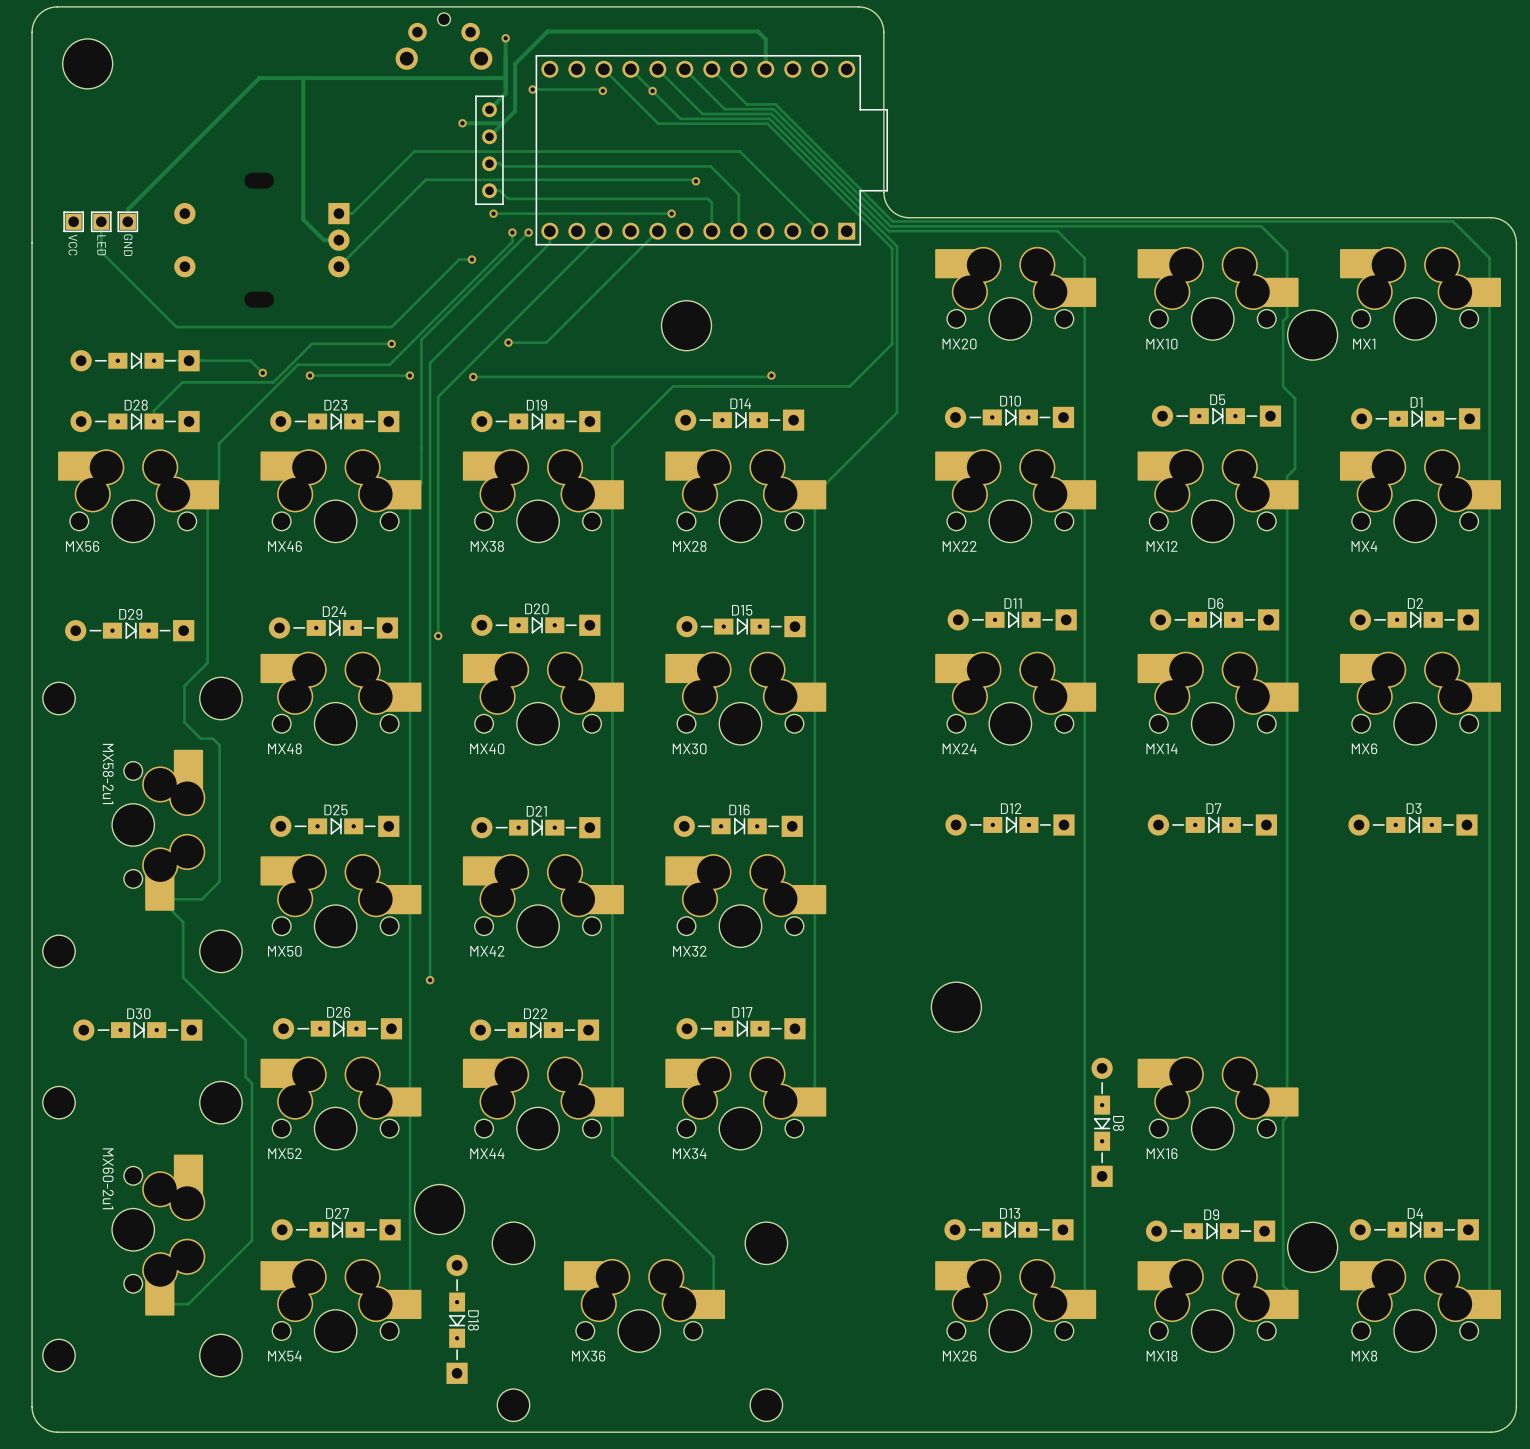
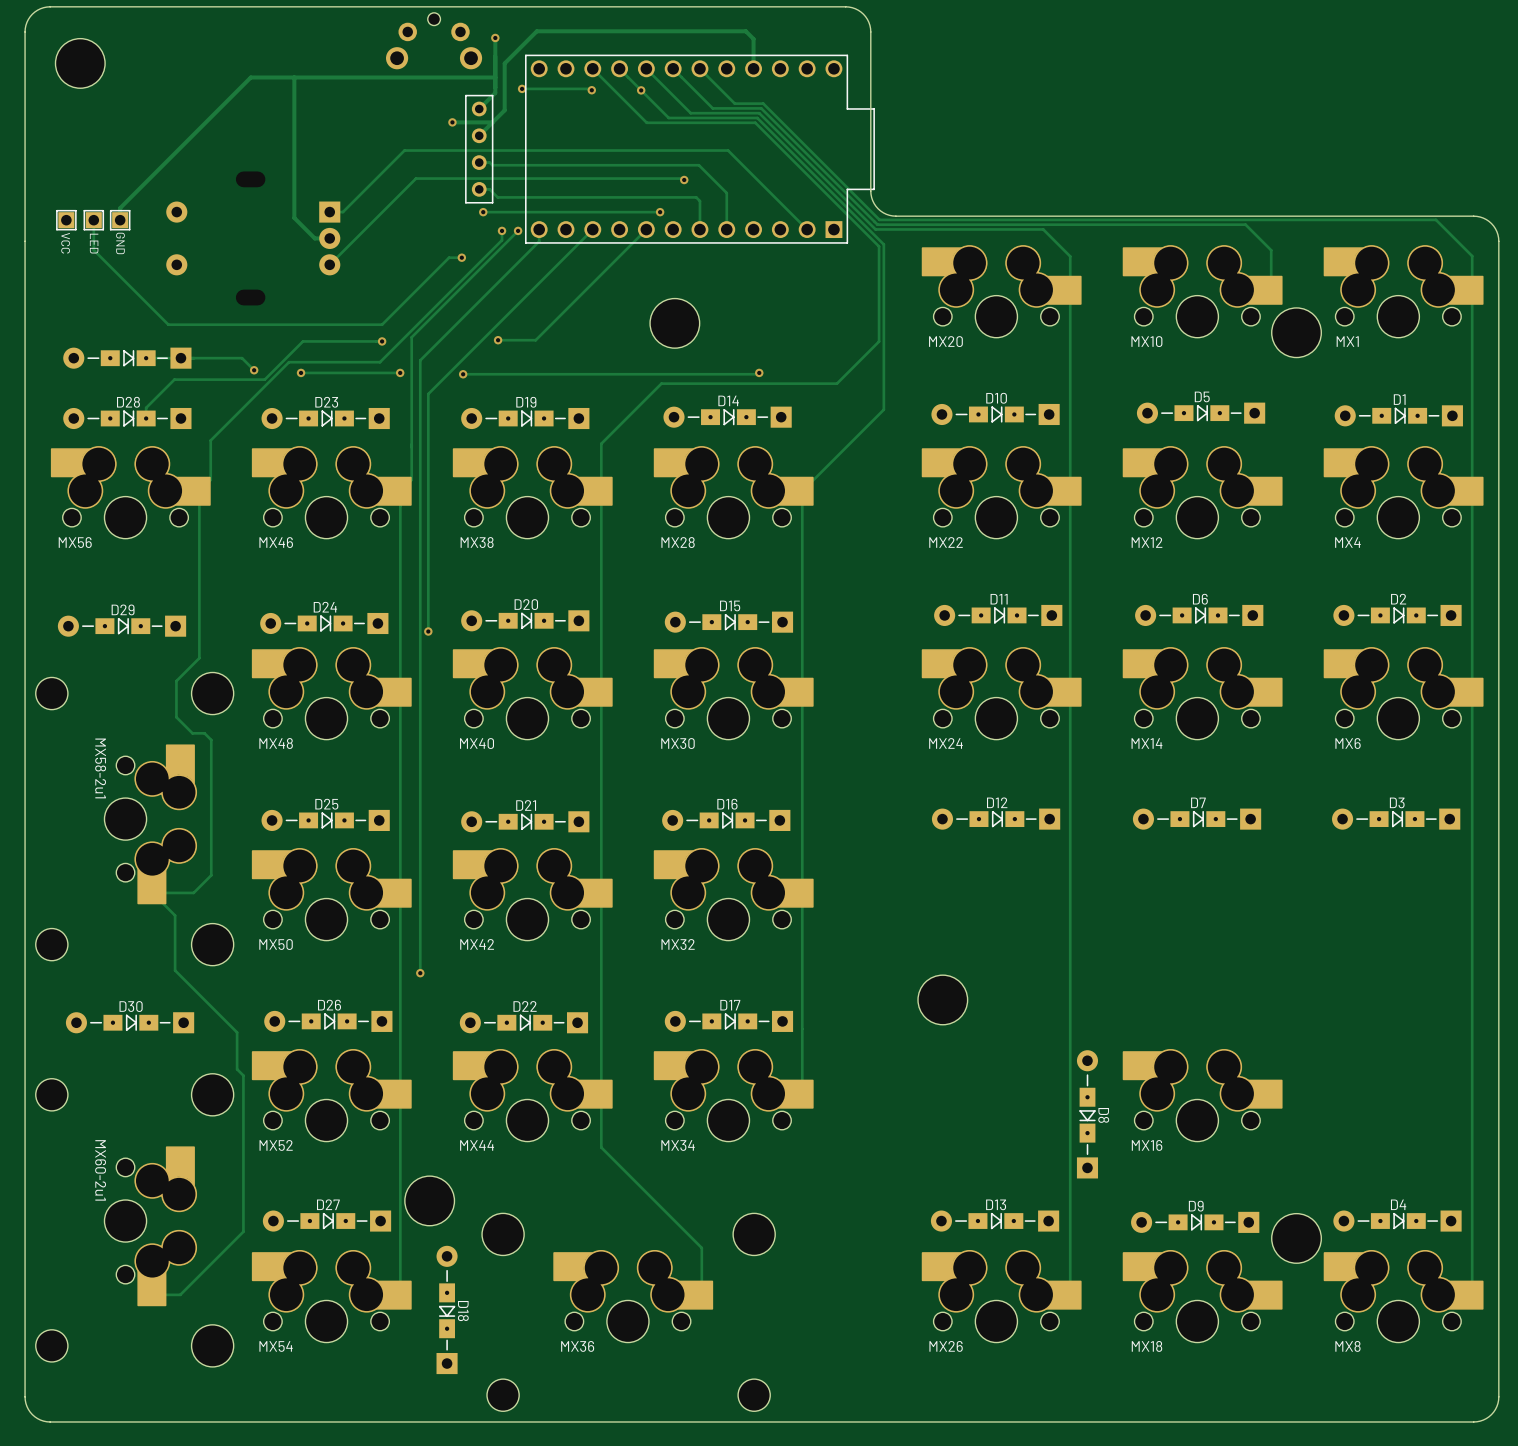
track: (1287, 292) (1287, 316) (1283, 320) (1283, 386) (1295, 398) (1295, 468) (1287, 476) (1287, 1116) (1283, 1120) (1283, 1285) (1287, 1289) (1287, 1304) -> none

